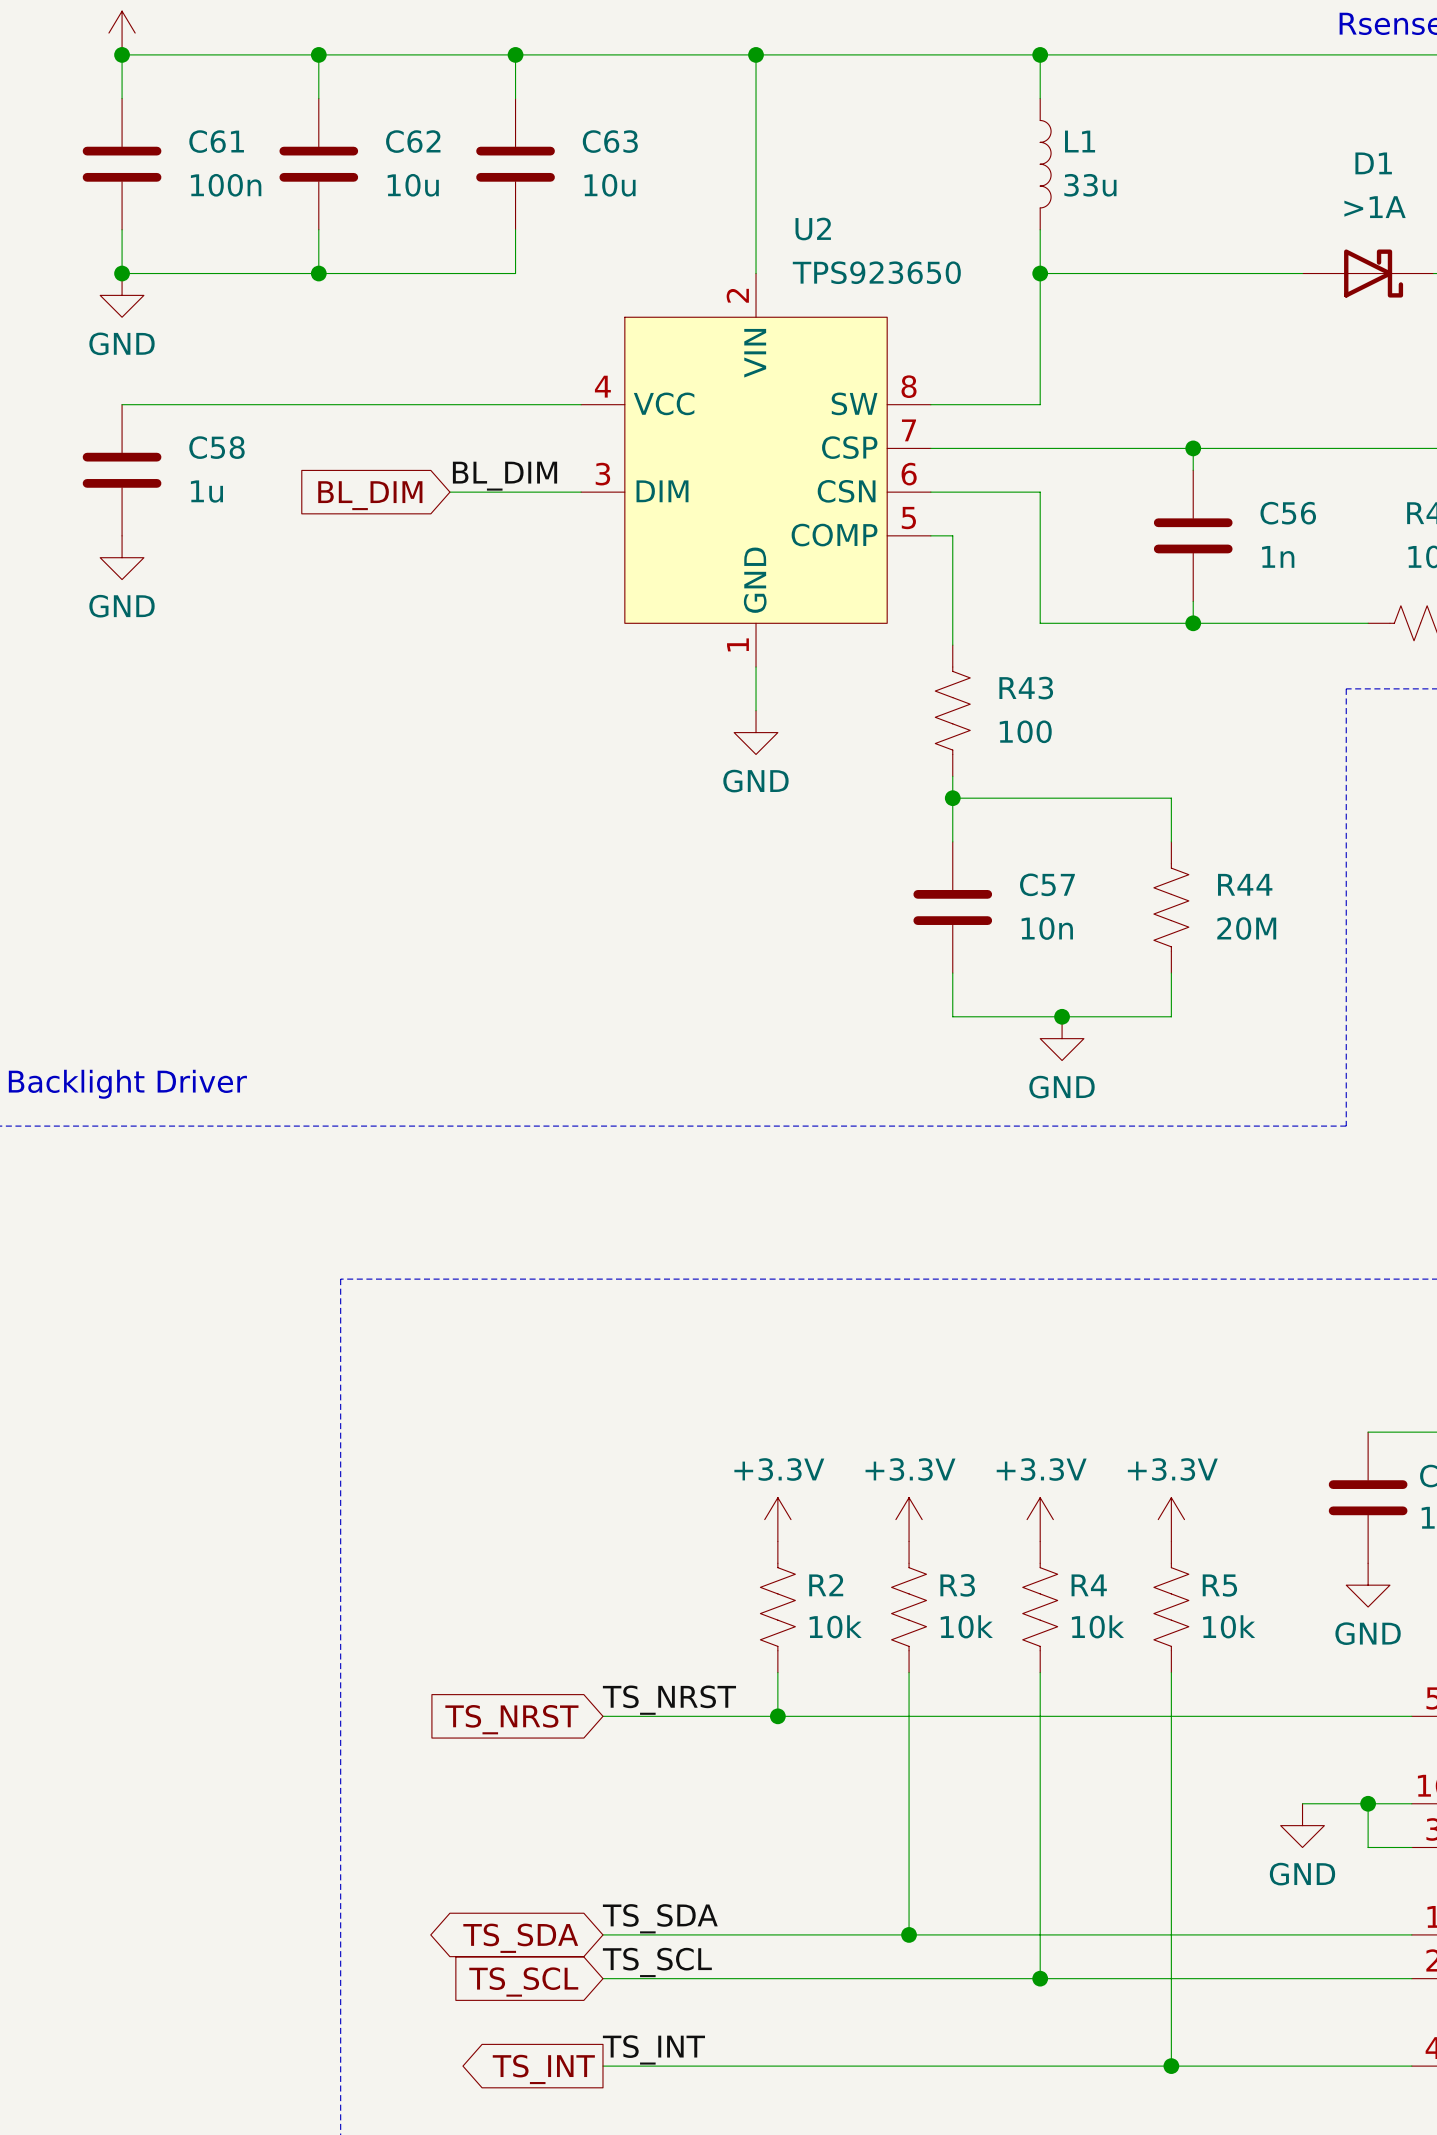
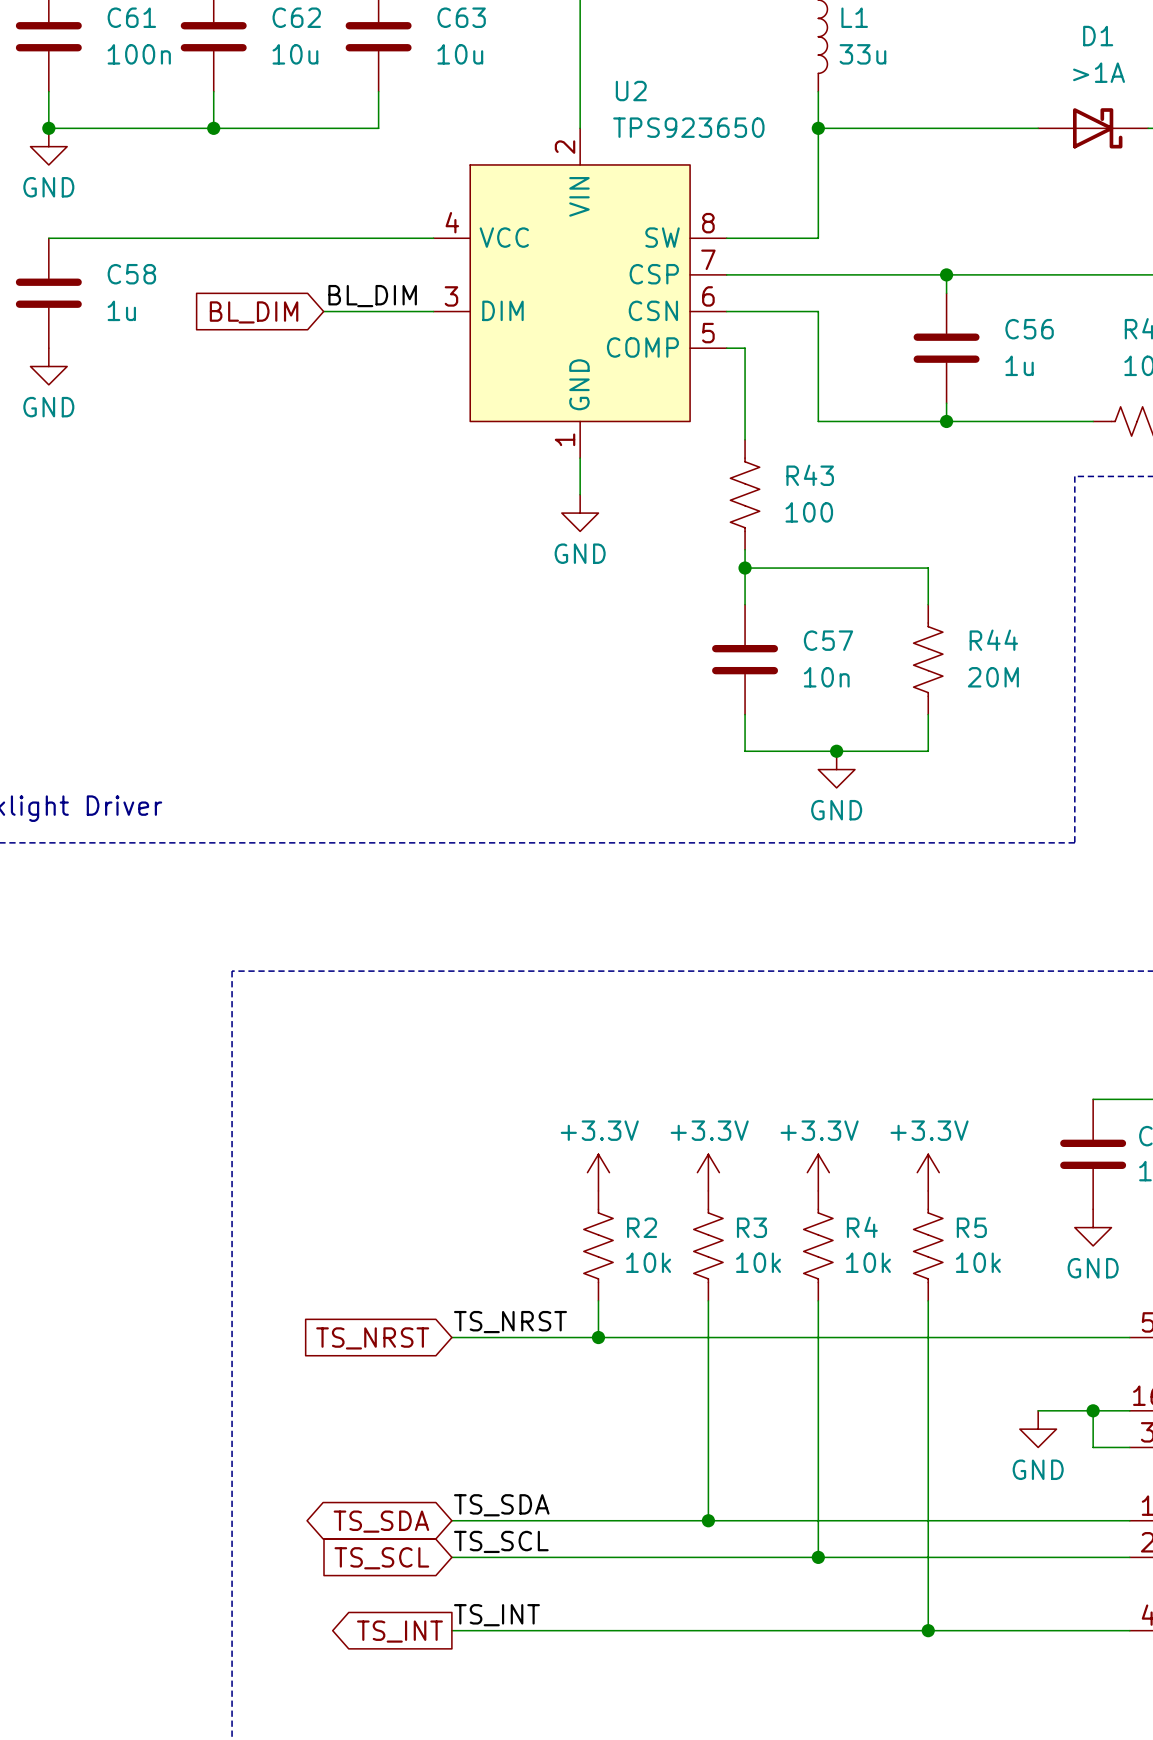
C56 value: 1n (1278, 556) -> 1u (1019, 365)

